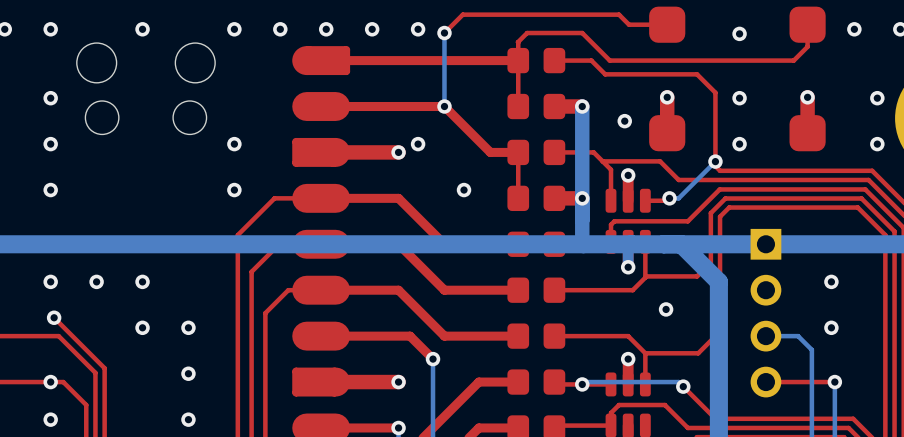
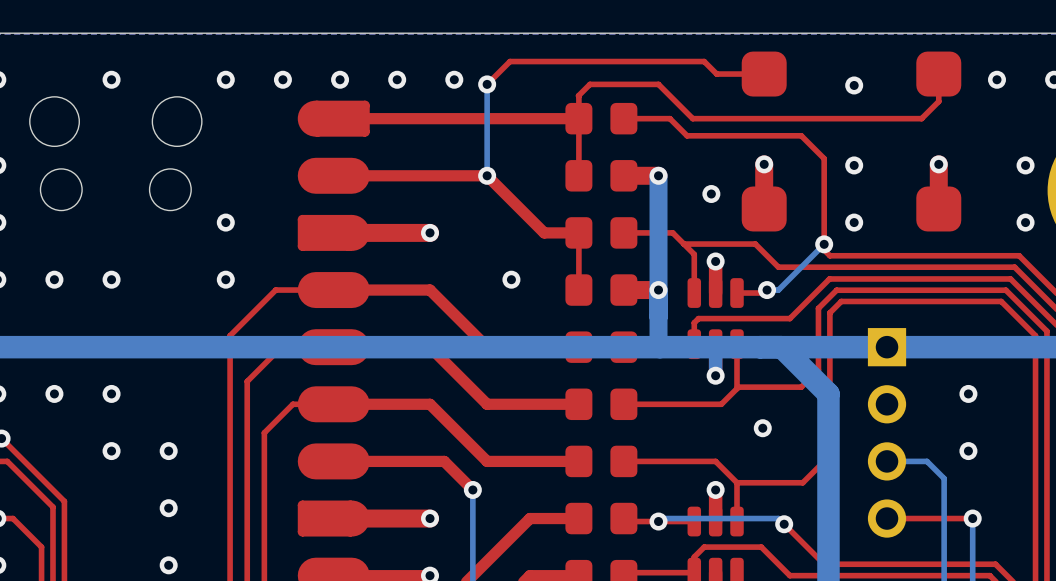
via: (418, 144) -> none
via: none -> (54, 279)
via: none -> (111, 279)

